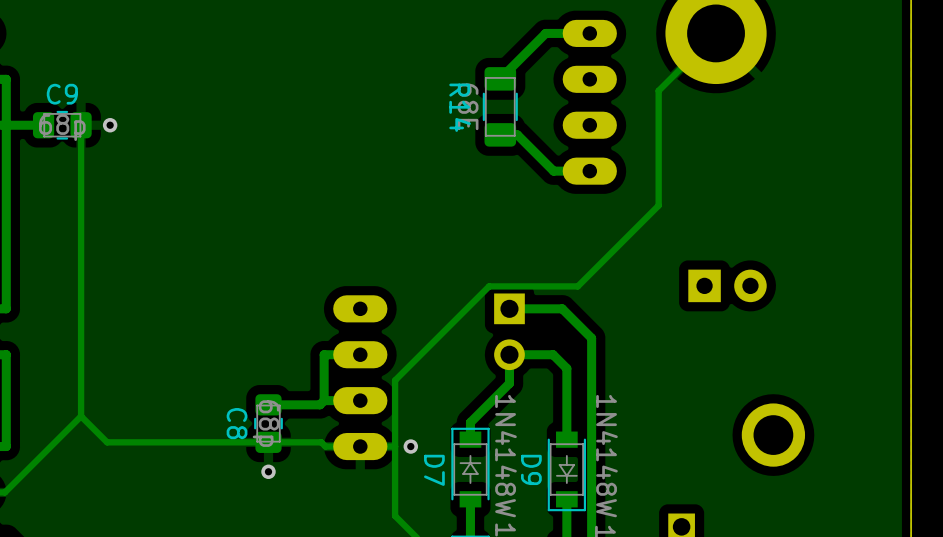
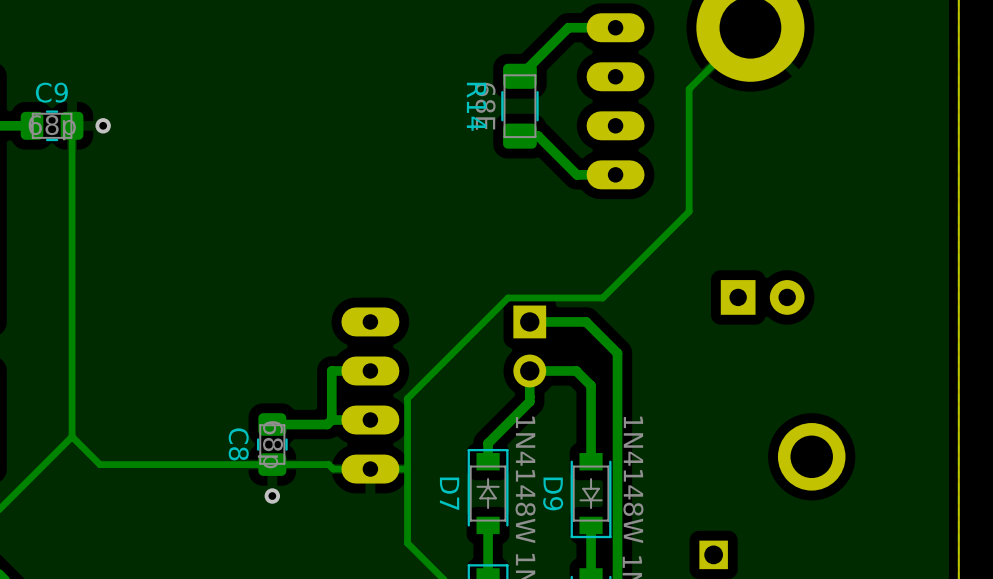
via: (410, 446) -> none

